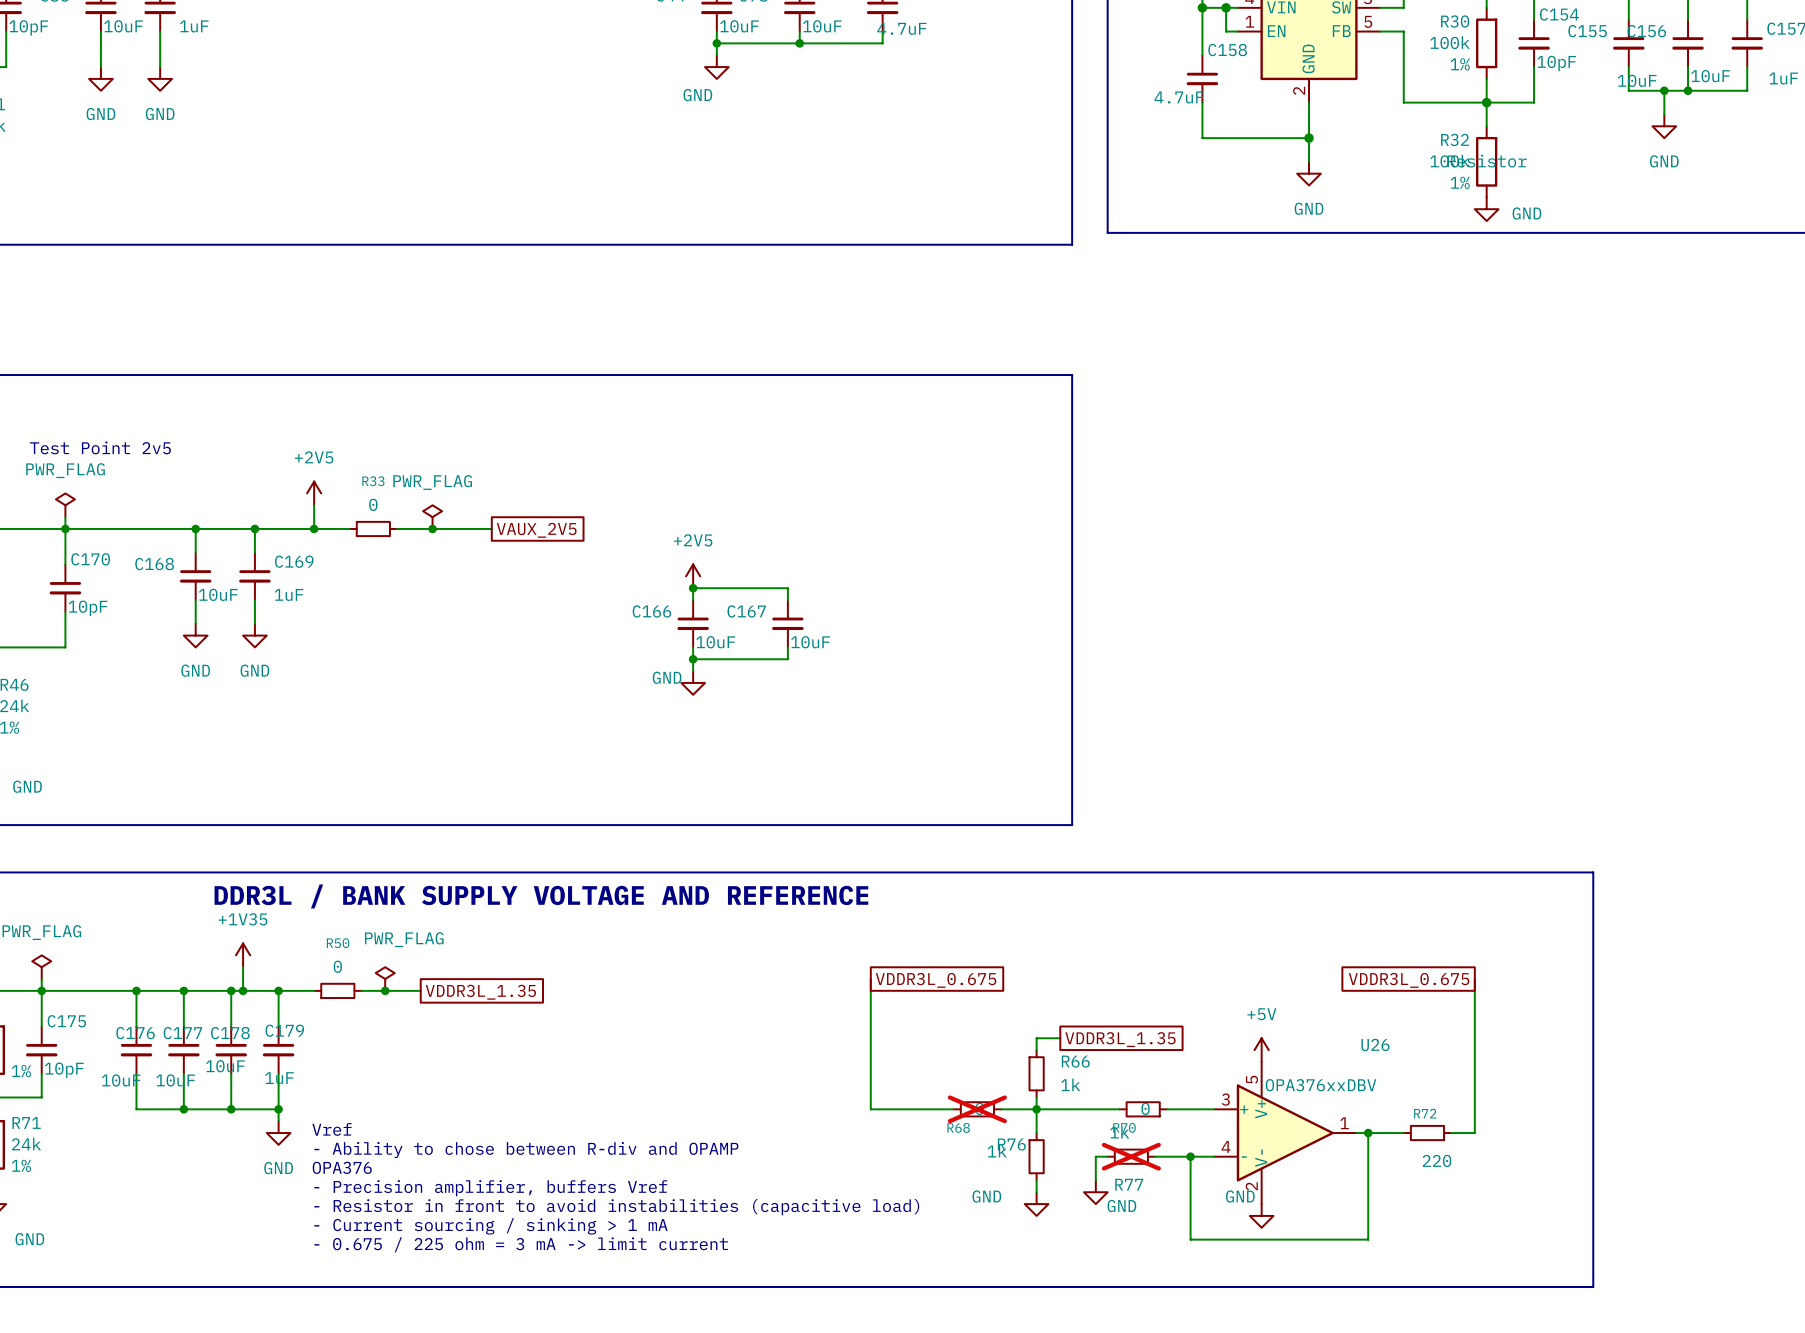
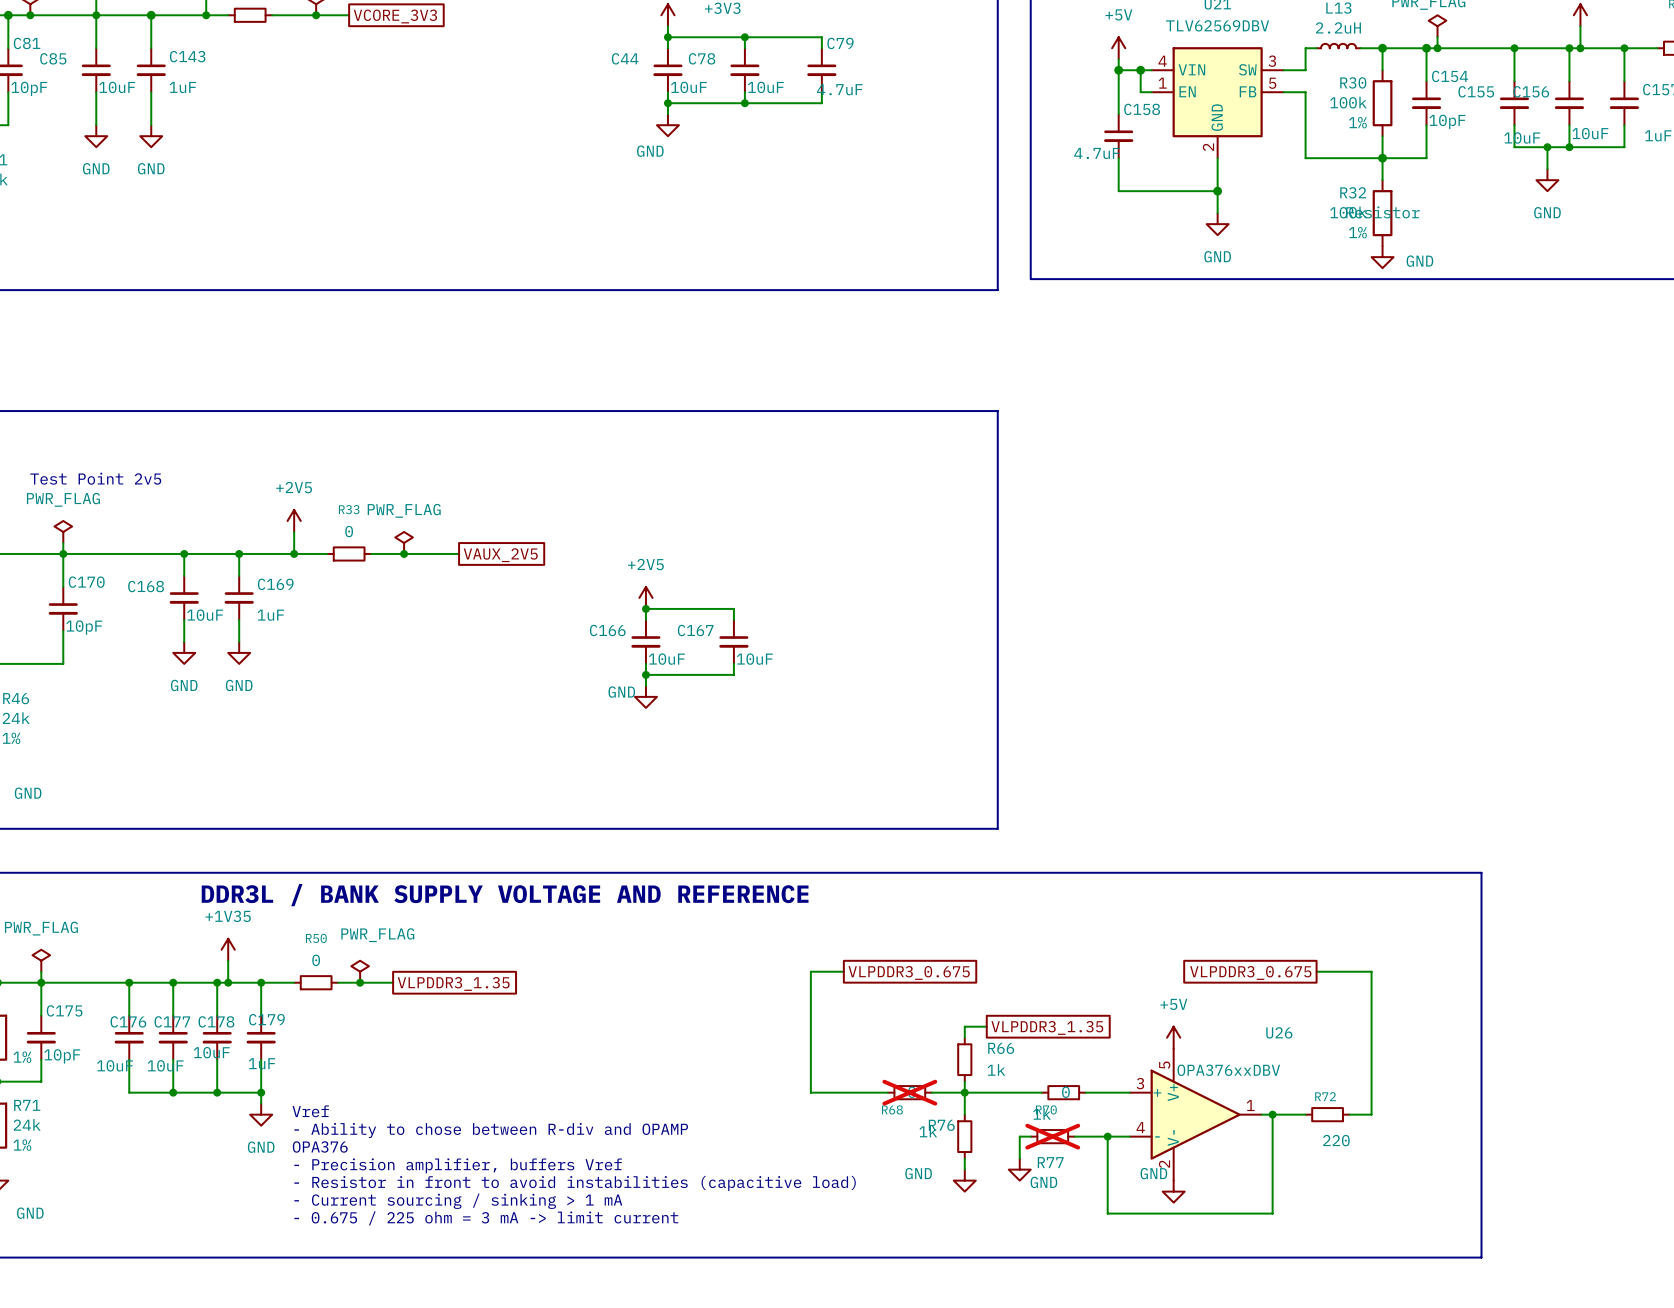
wire: none -> (810, 971) (843, 971)
wire: none -> (1316, 971) (1371, 971)
global label: VDDR3L_0.675 (936, 980) -> VLPDDR3_0.675 (909, 972)
global label: VDDR3L_0.675 (1409, 980) -> VLPDDR3_0.675 (1250, 972)
global label: VDDR3L_1.35 (480, 992) -> VLPDDR3_1.35 (453, 983)
global label: VDDR3L_1.35 (1120, 1039) -> VLPDDR3_1.35 (1047, 1027)

